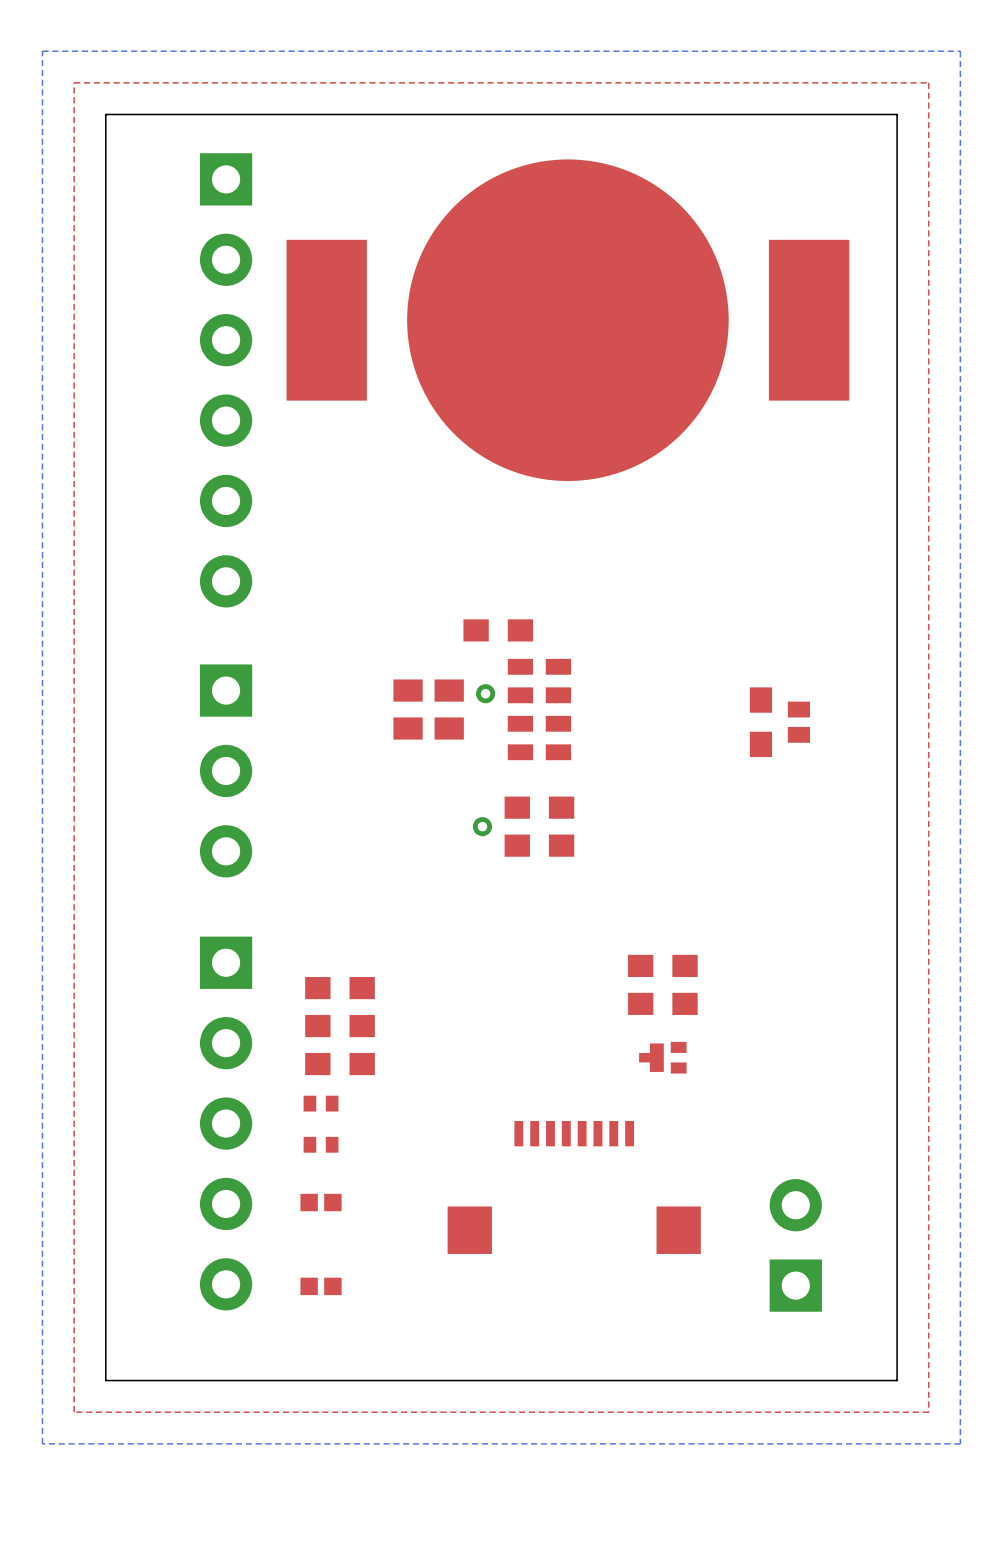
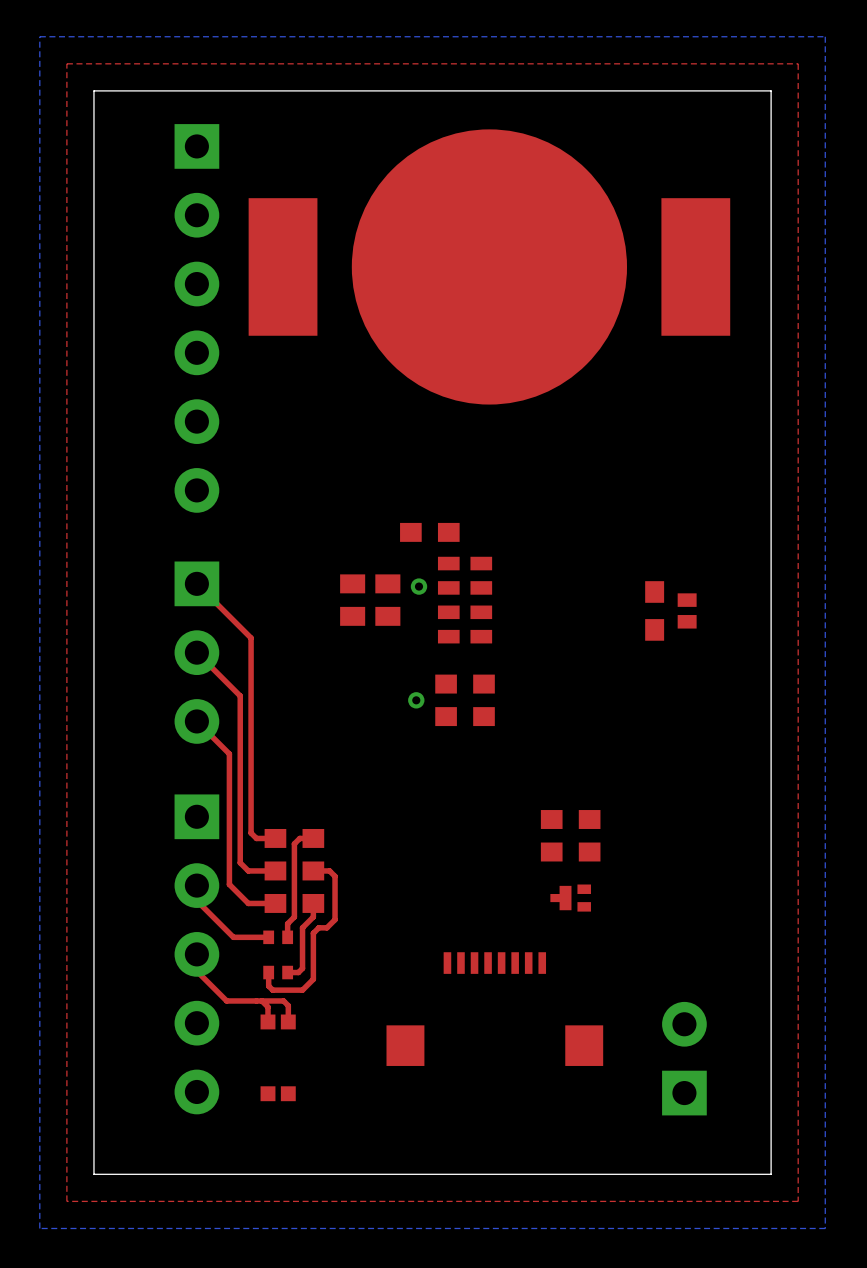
top track: none -> (196, 583) (251, 638) (251, 833) (256, 838) (275, 838)
top track: none -> (196, 652) (240, 695) (240, 862) (248, 870) (275, 870)
top track: none -> (196, 721) (229, 753) (229, 884) (248, 903) (275, 903)
top track: none -> (313, 838) (299, 838) (294, 843) (294, 917) (287, 923) (287, 937)
top track: none -> (313, 870) (329, 870) (335, 876) (335, 919) (326, 927) (318, 927) (313, 933) (313, 979) (302, 990) (272, 990) (268, 986) (268, 972)
top track: none -> (196, 885) (196, 900) (233, 937) (268, 937)
top track: none -> (313, 903) (313, 917) (302, 927) (302, 968) (298, 972) (287, 972)
top track: none -> (196, 954) (196, 971) (226, 1000) (283, 1000) (288, 1005) (288, 1021)
top track: none -> (261, 1000) (268, 1007) (268, 1021)

